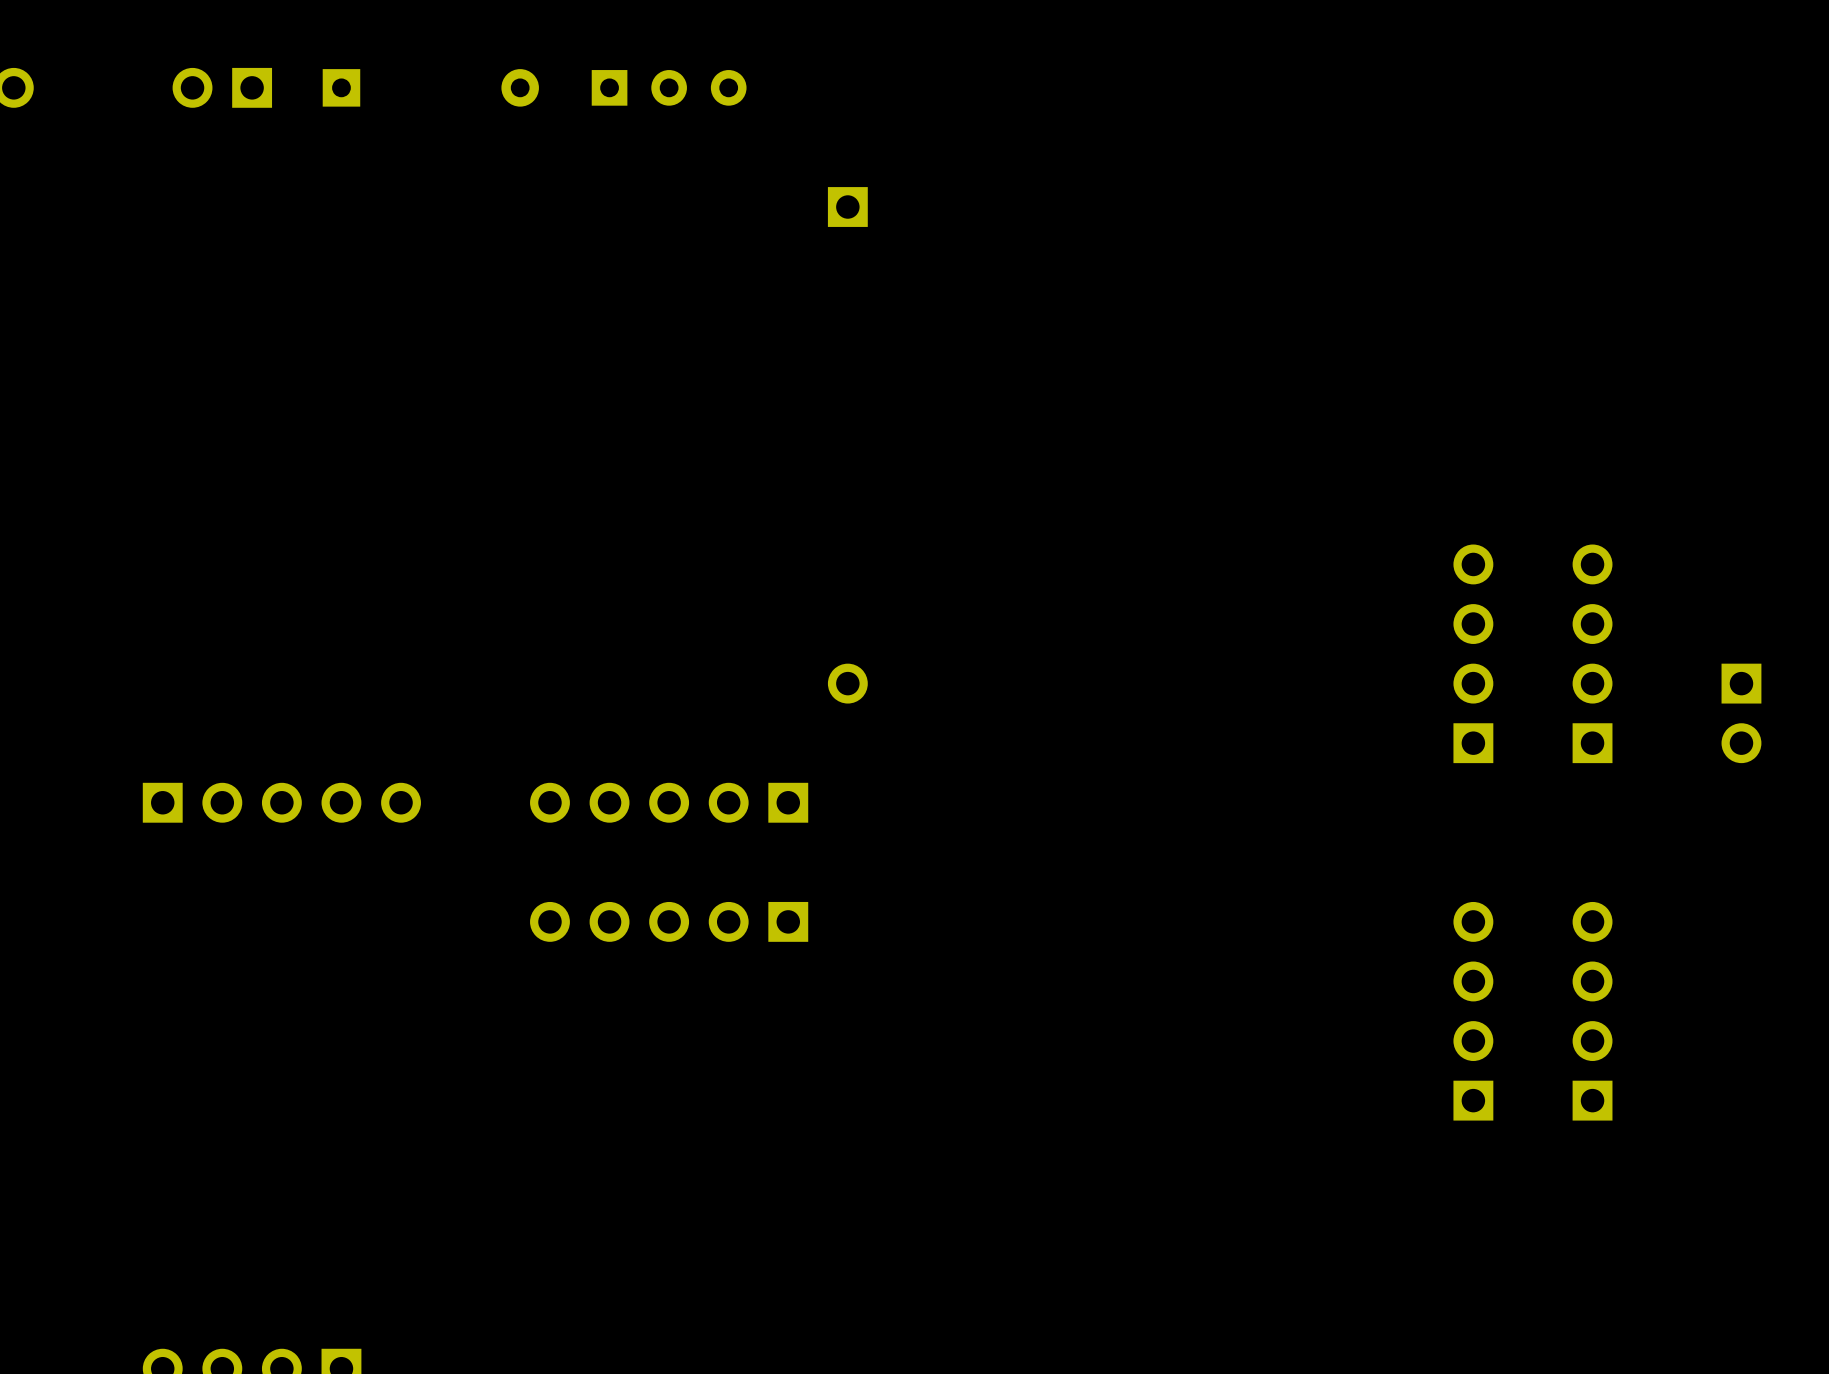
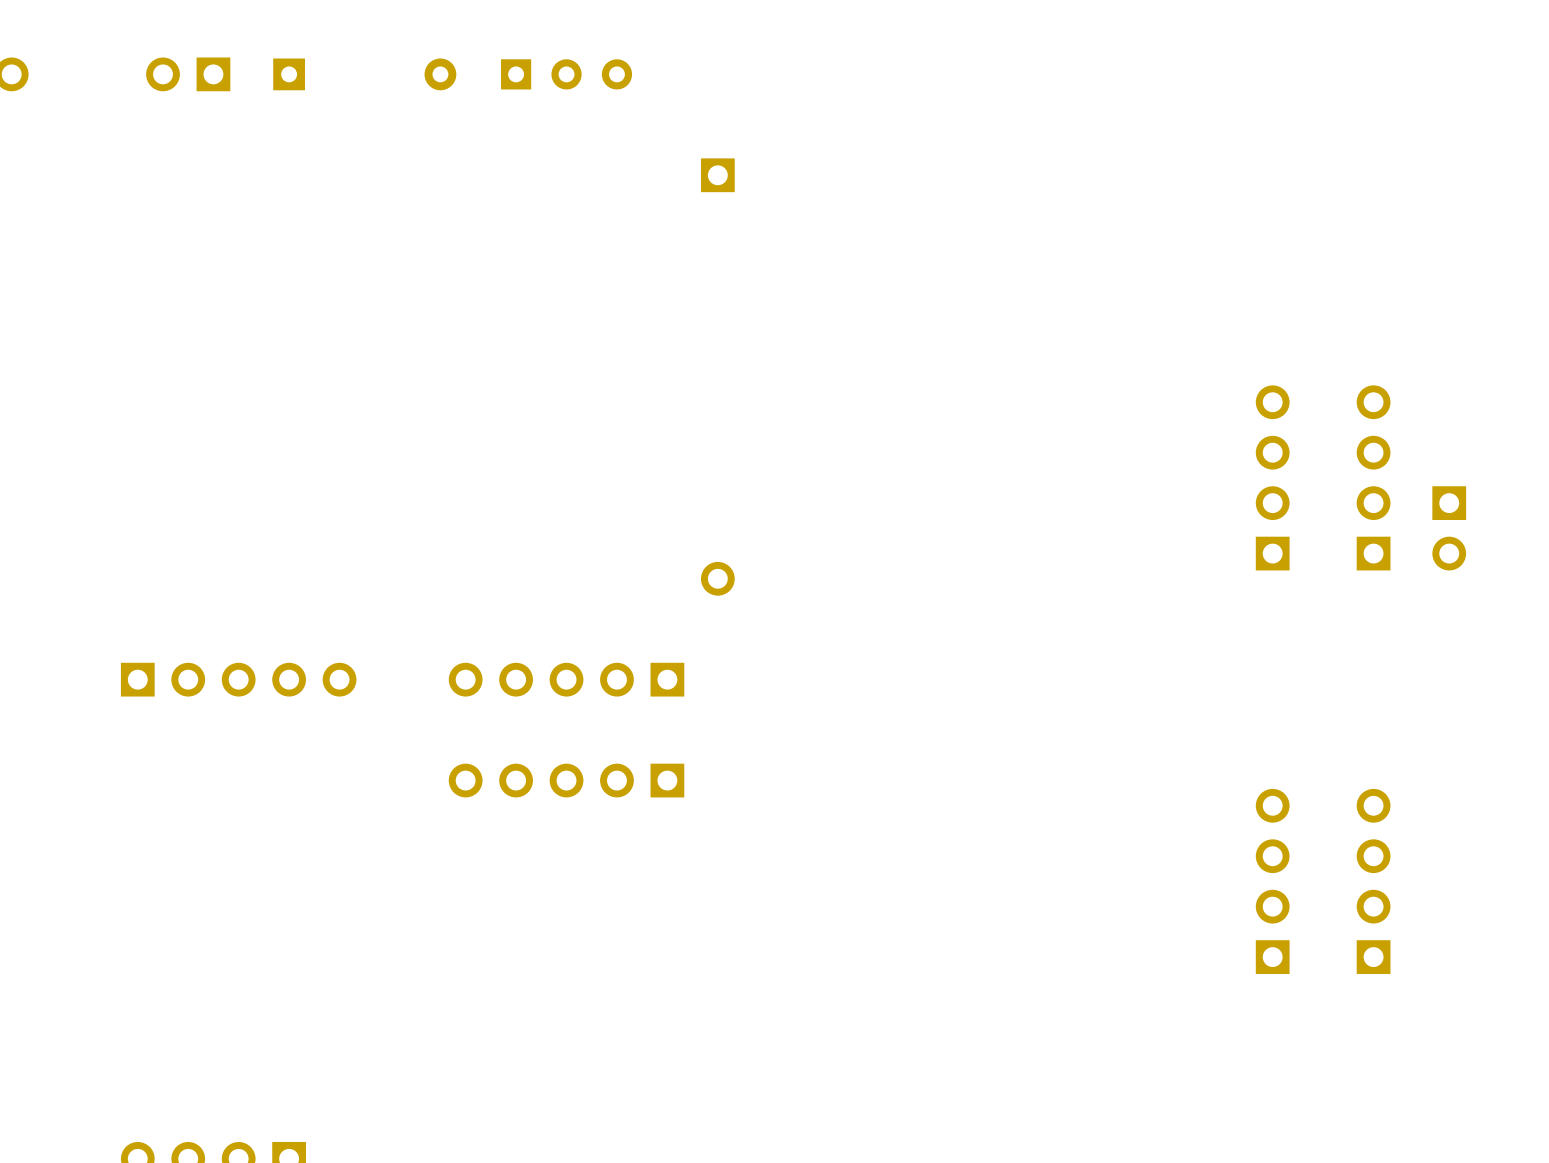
part: none -> (1272, 477)
part: none -> (1373, 477)
part: (1473, 653) -> none
part: (1592, 653) -> none
part position: (1741, 713) -> (1449, 528)
part position: (1473, 1011) -> (1272, 881)
part position: (1592, 1011) -> (1373, 881)

